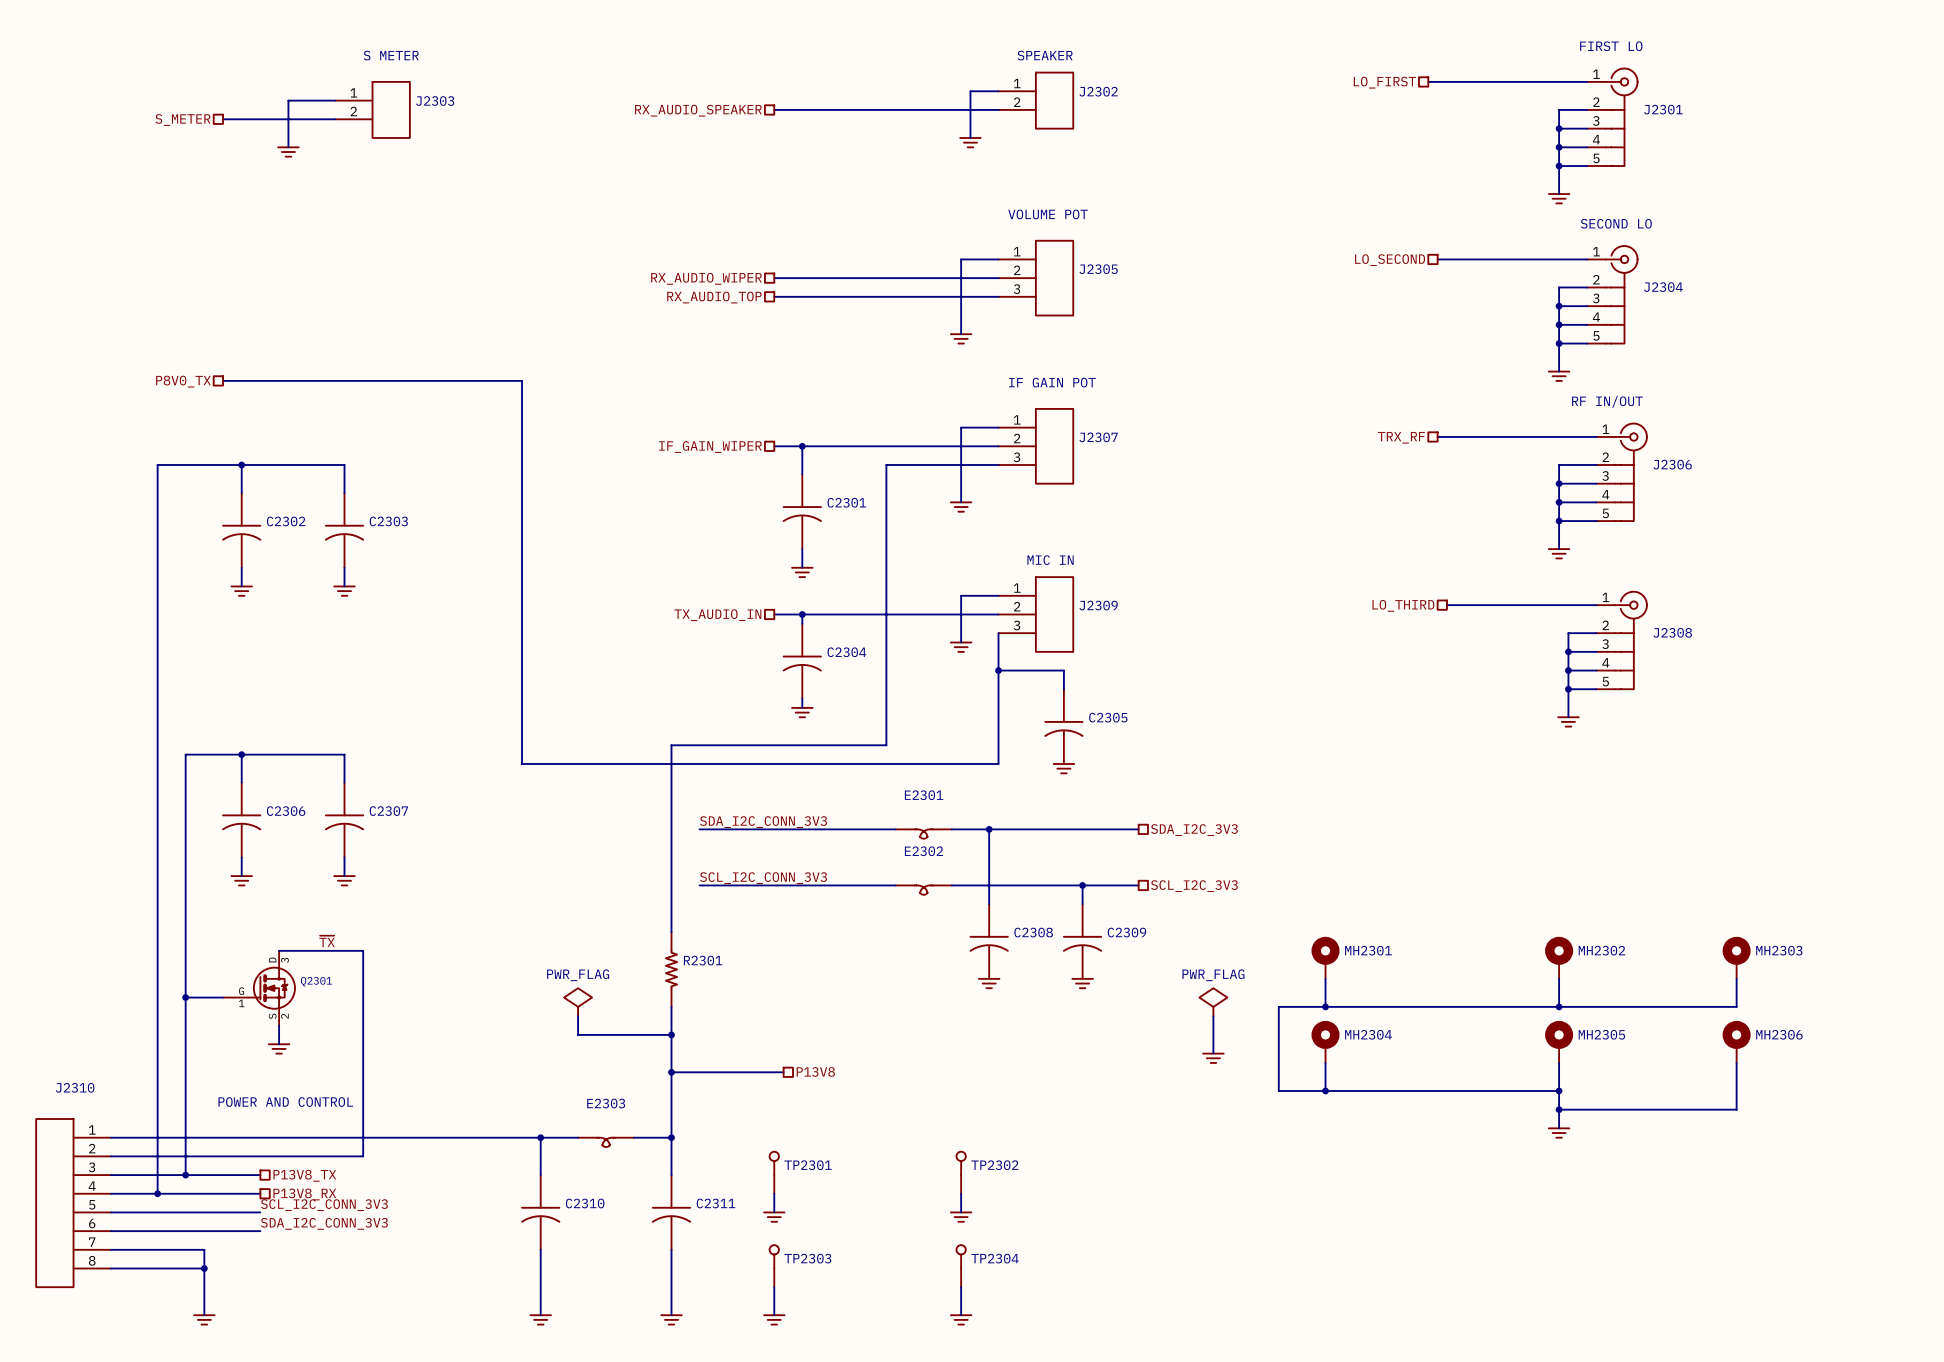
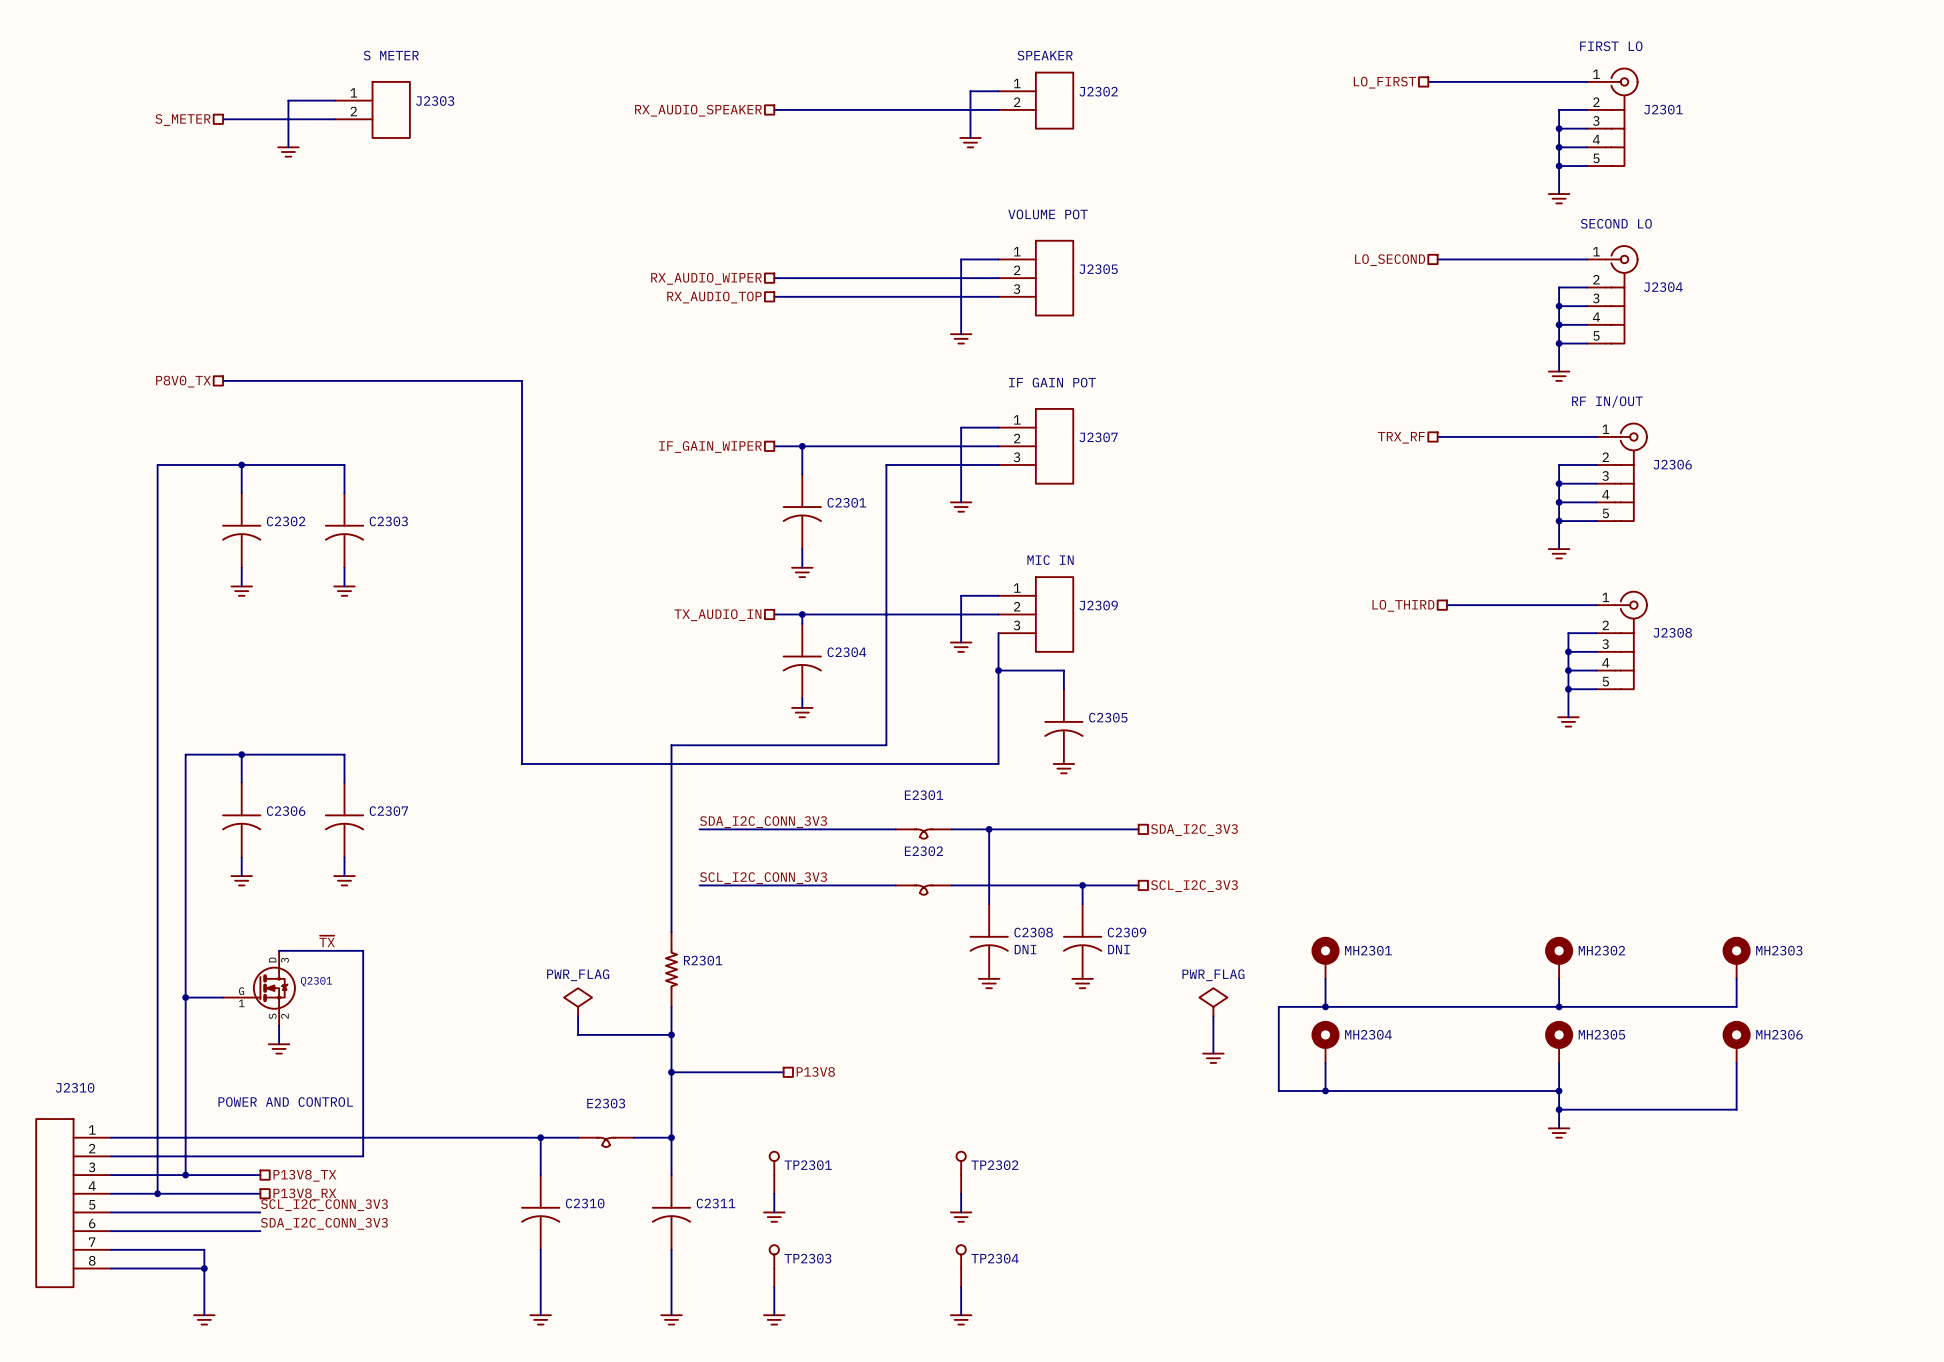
C2308 value: none -> DNI (1025, 949)
C2309 value: none -> DNI (1119, 949)

